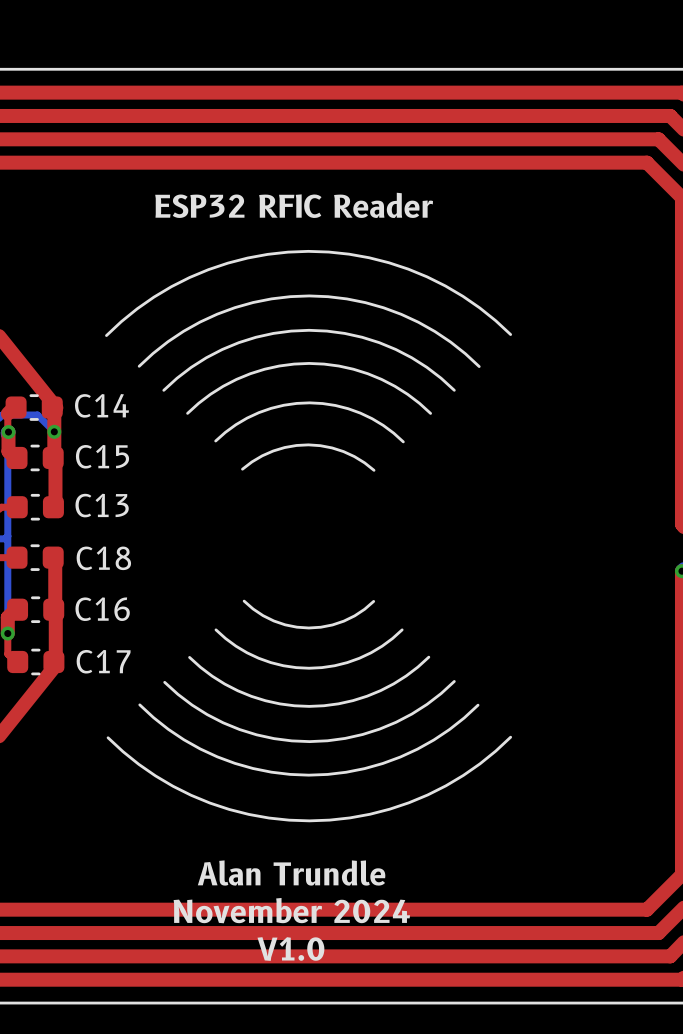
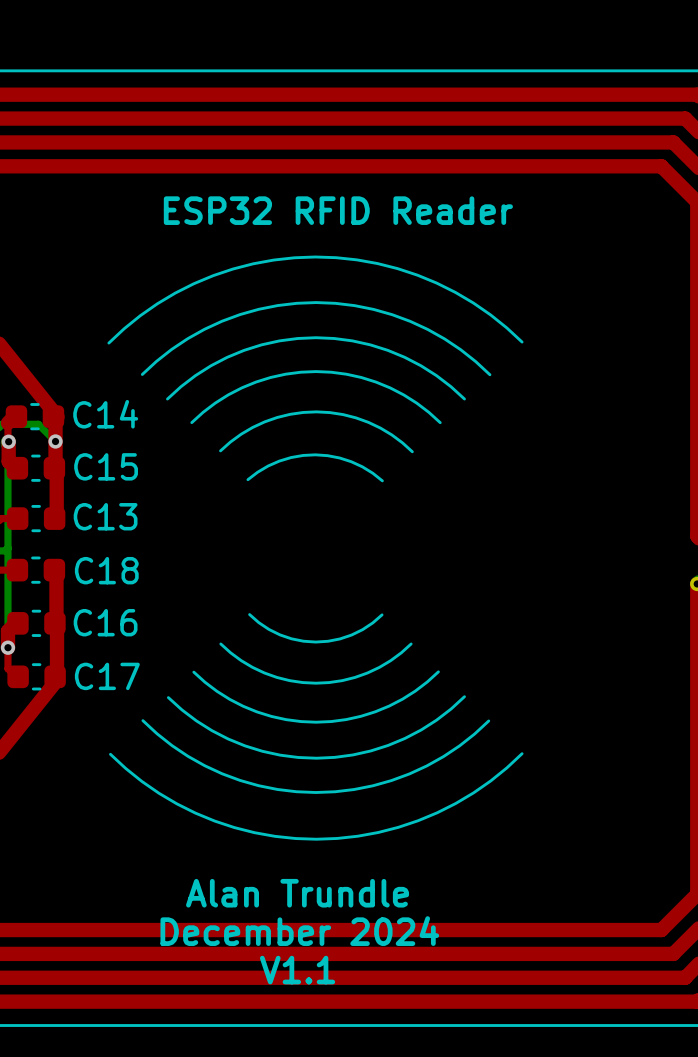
text: ESP32 RFIC Reader (294, 205) -> ESP32 RFID Reader (338, 210)
text: November 2024 (291, 910) -> December 2024 (299, 931)
text: V1.0 (290, 949) -> V1.1 (297, 970)

